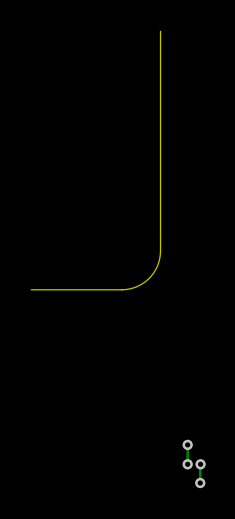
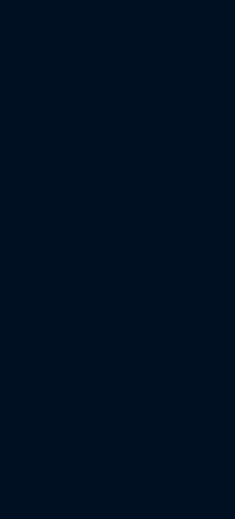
board edge: (160, 31) (160, 251) (155, 270) (141, 284) (126, 289) (31, 289) -> none
track: (187, 444) (187, 464) -> none
via: (187, 444) -> none
via: (187, 464) -> none
track: (200, 464) (200, 483) -> none
via: (200, 464) -> none
via: (200, 483) -> none

